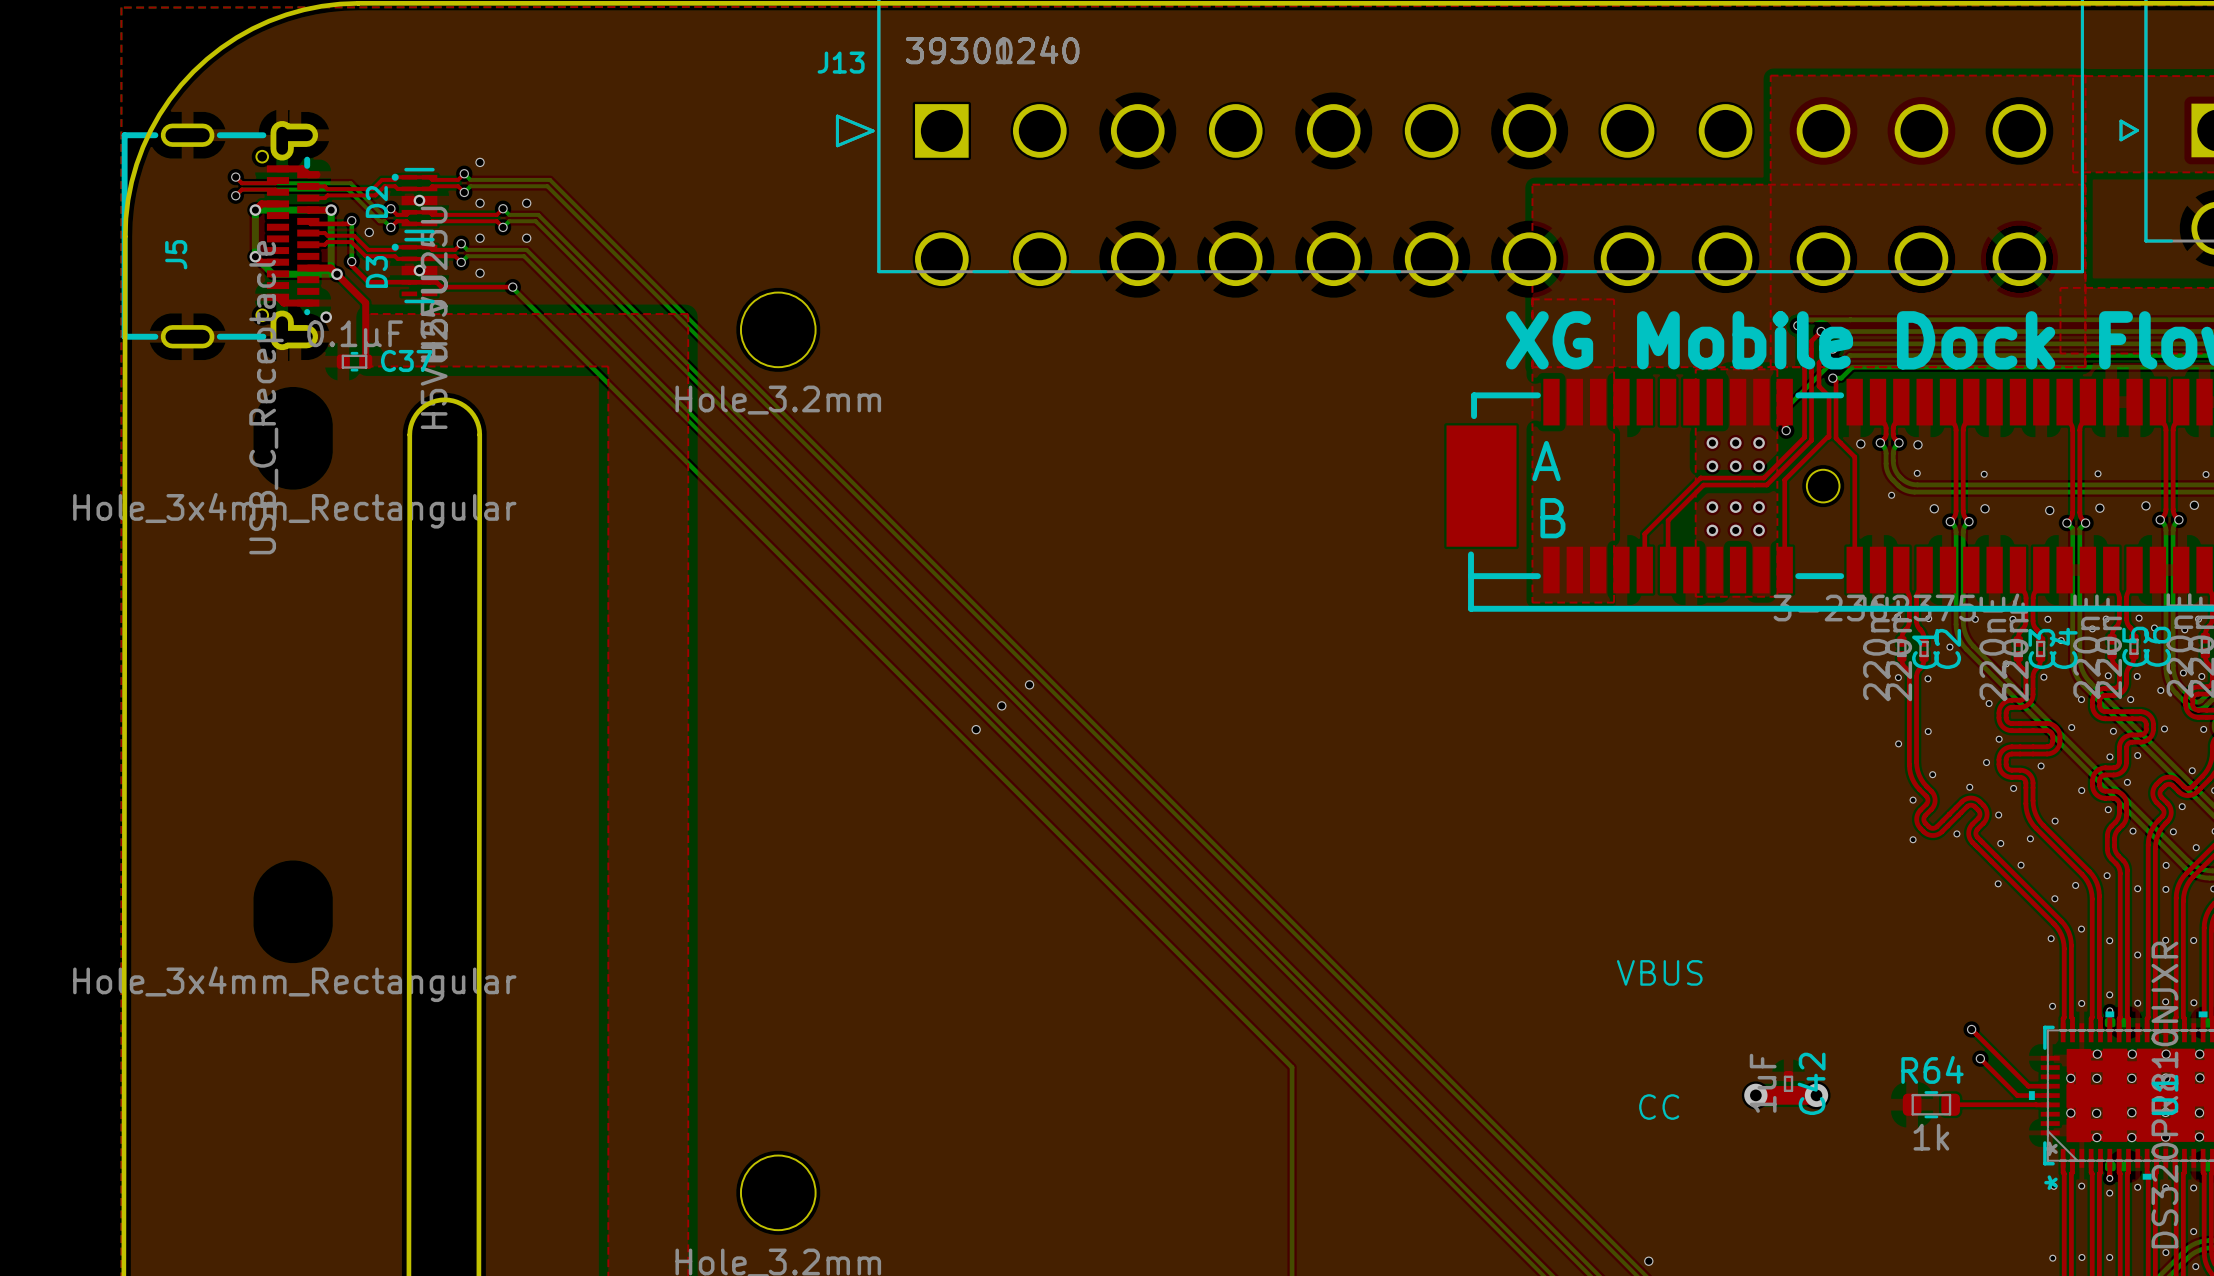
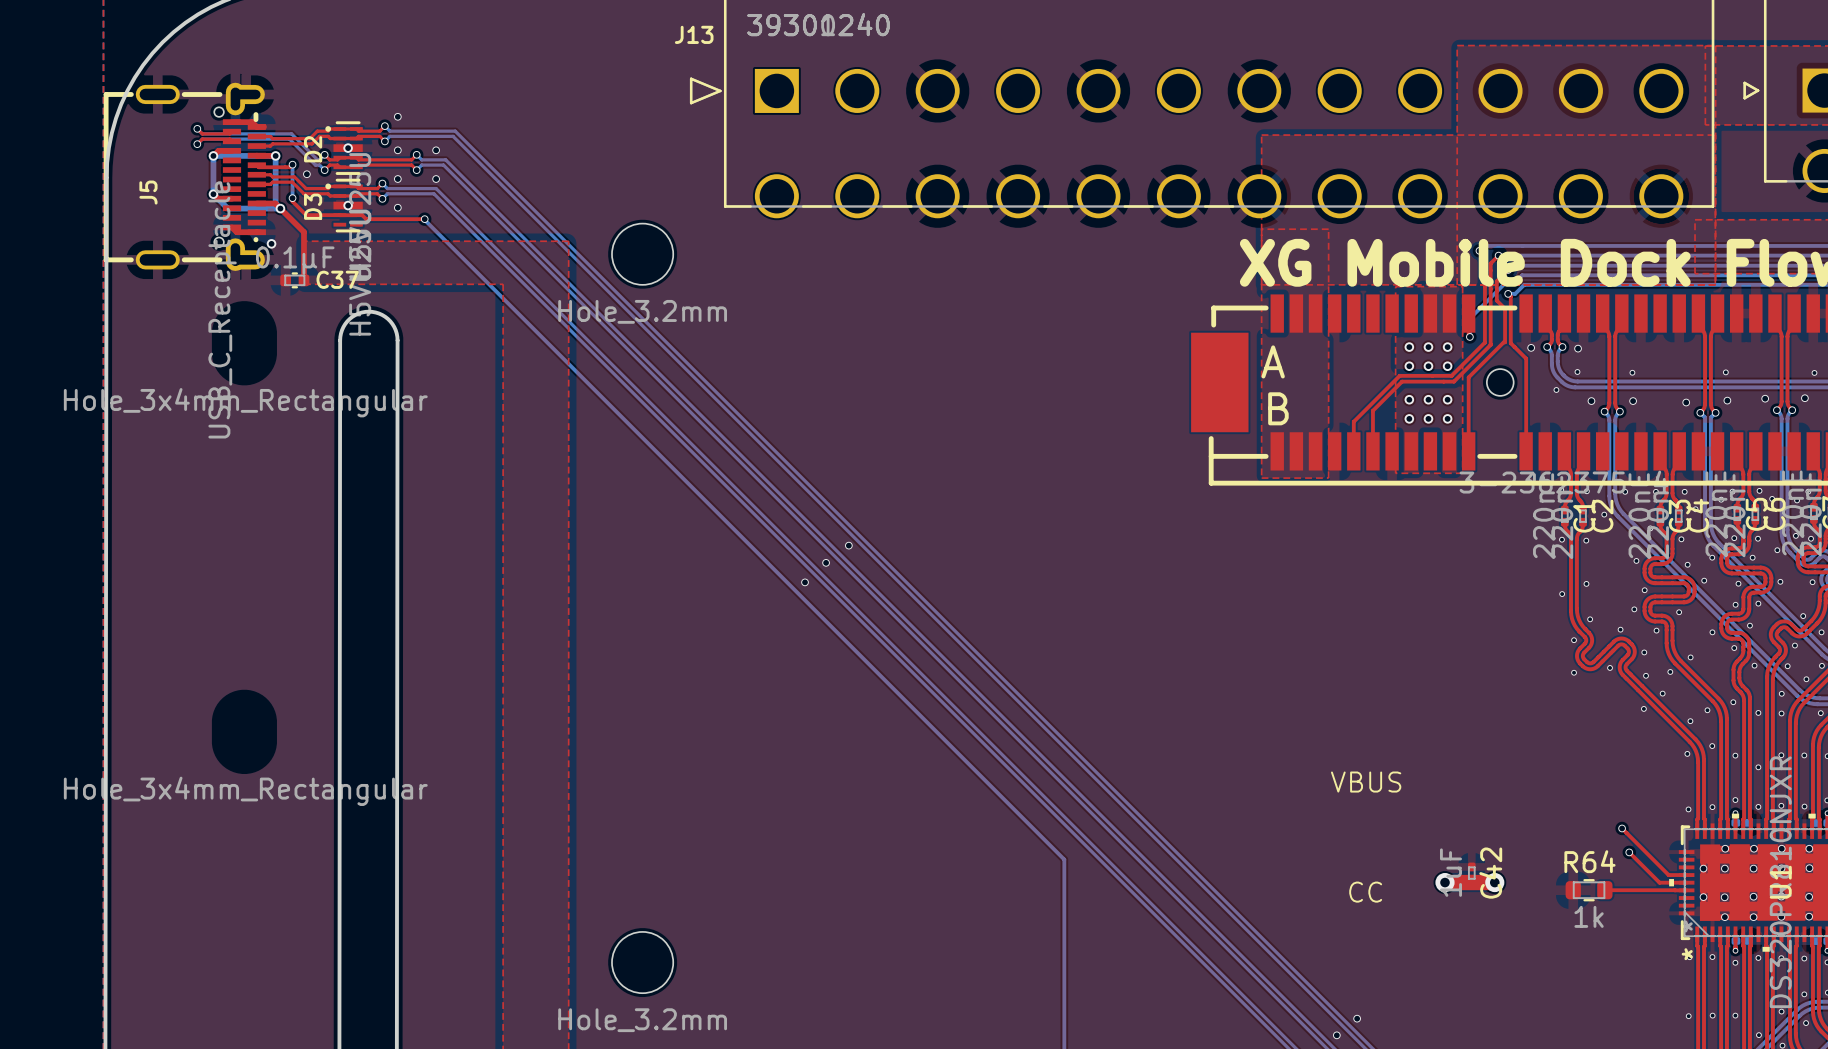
via: none -> (1687, 564)

